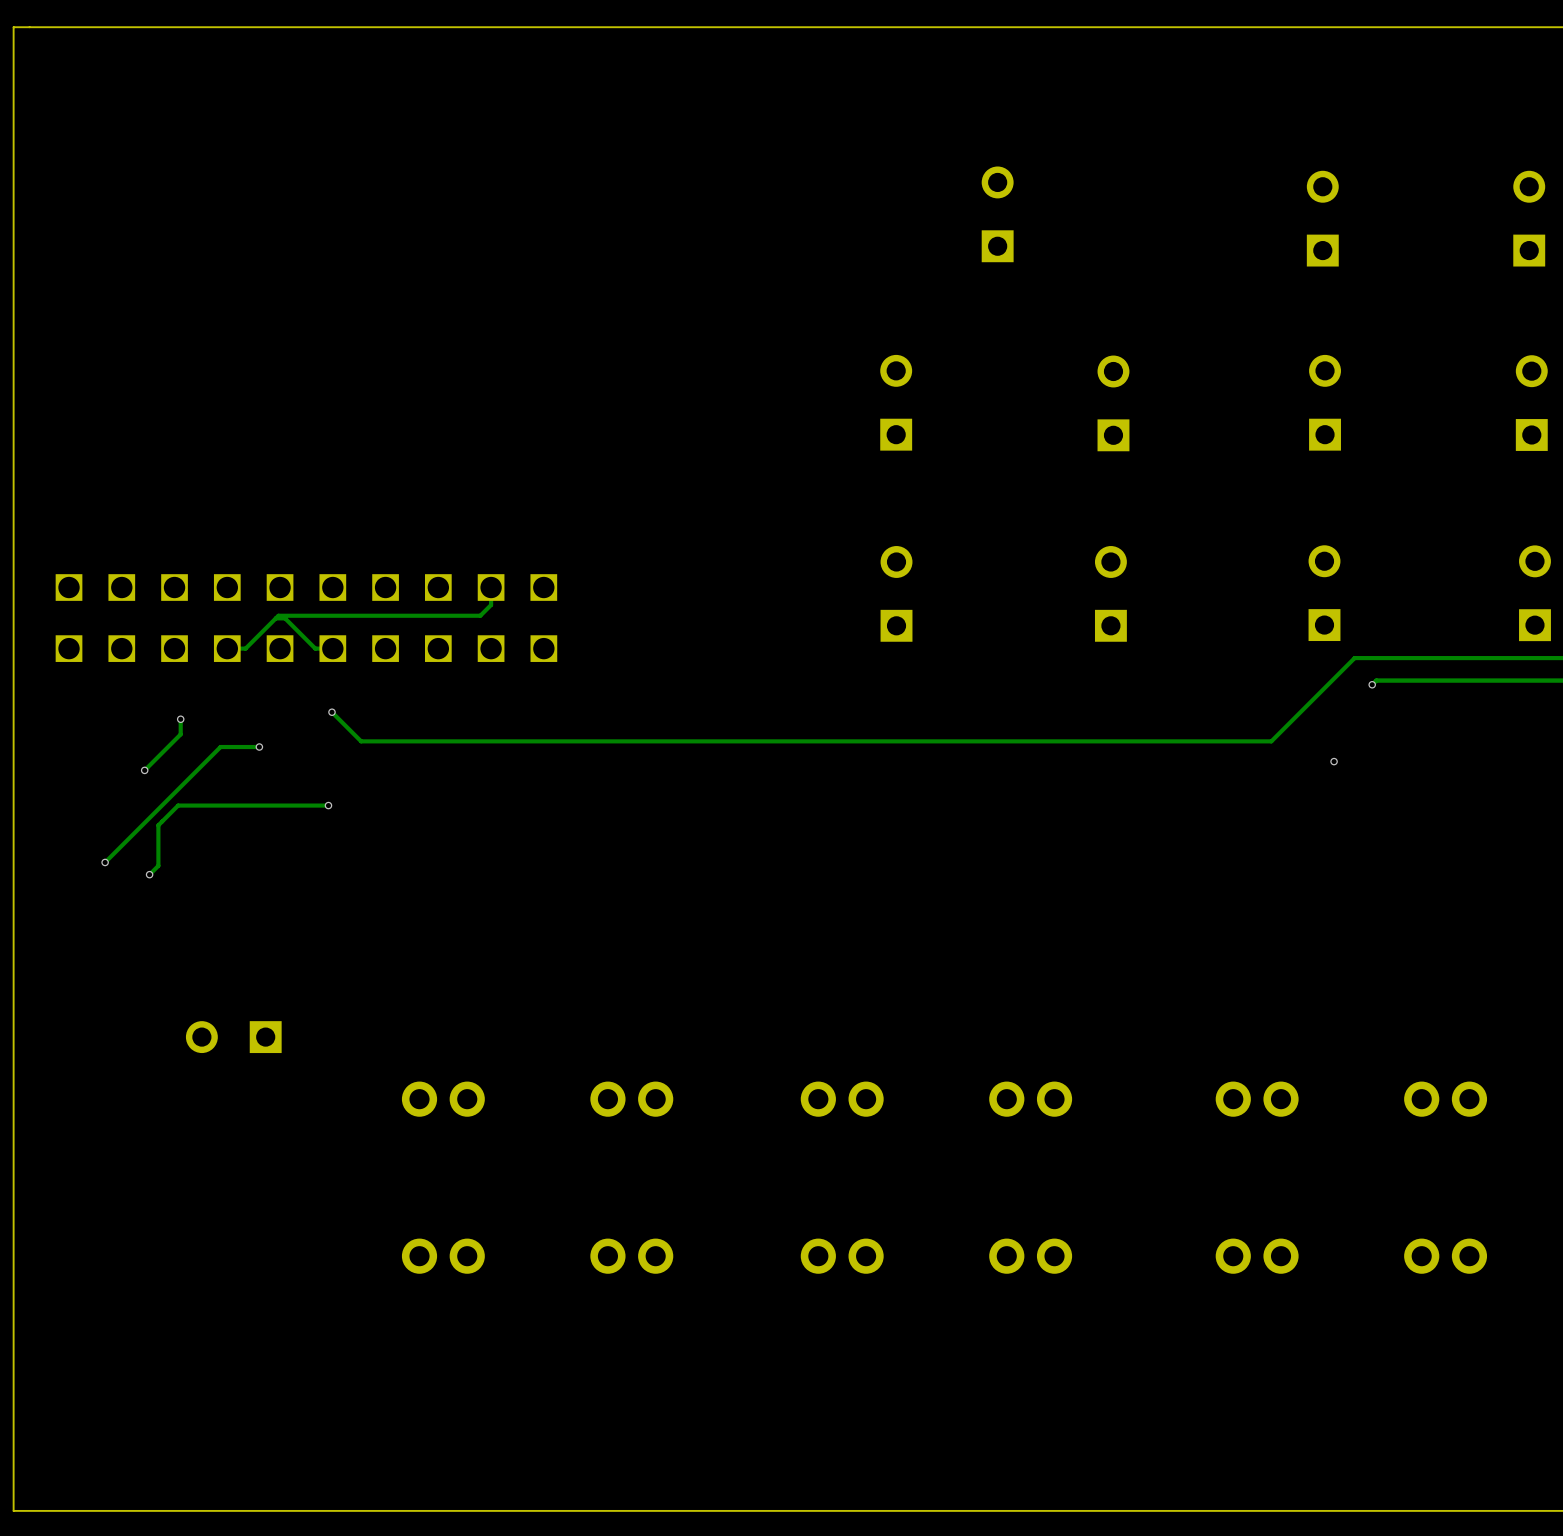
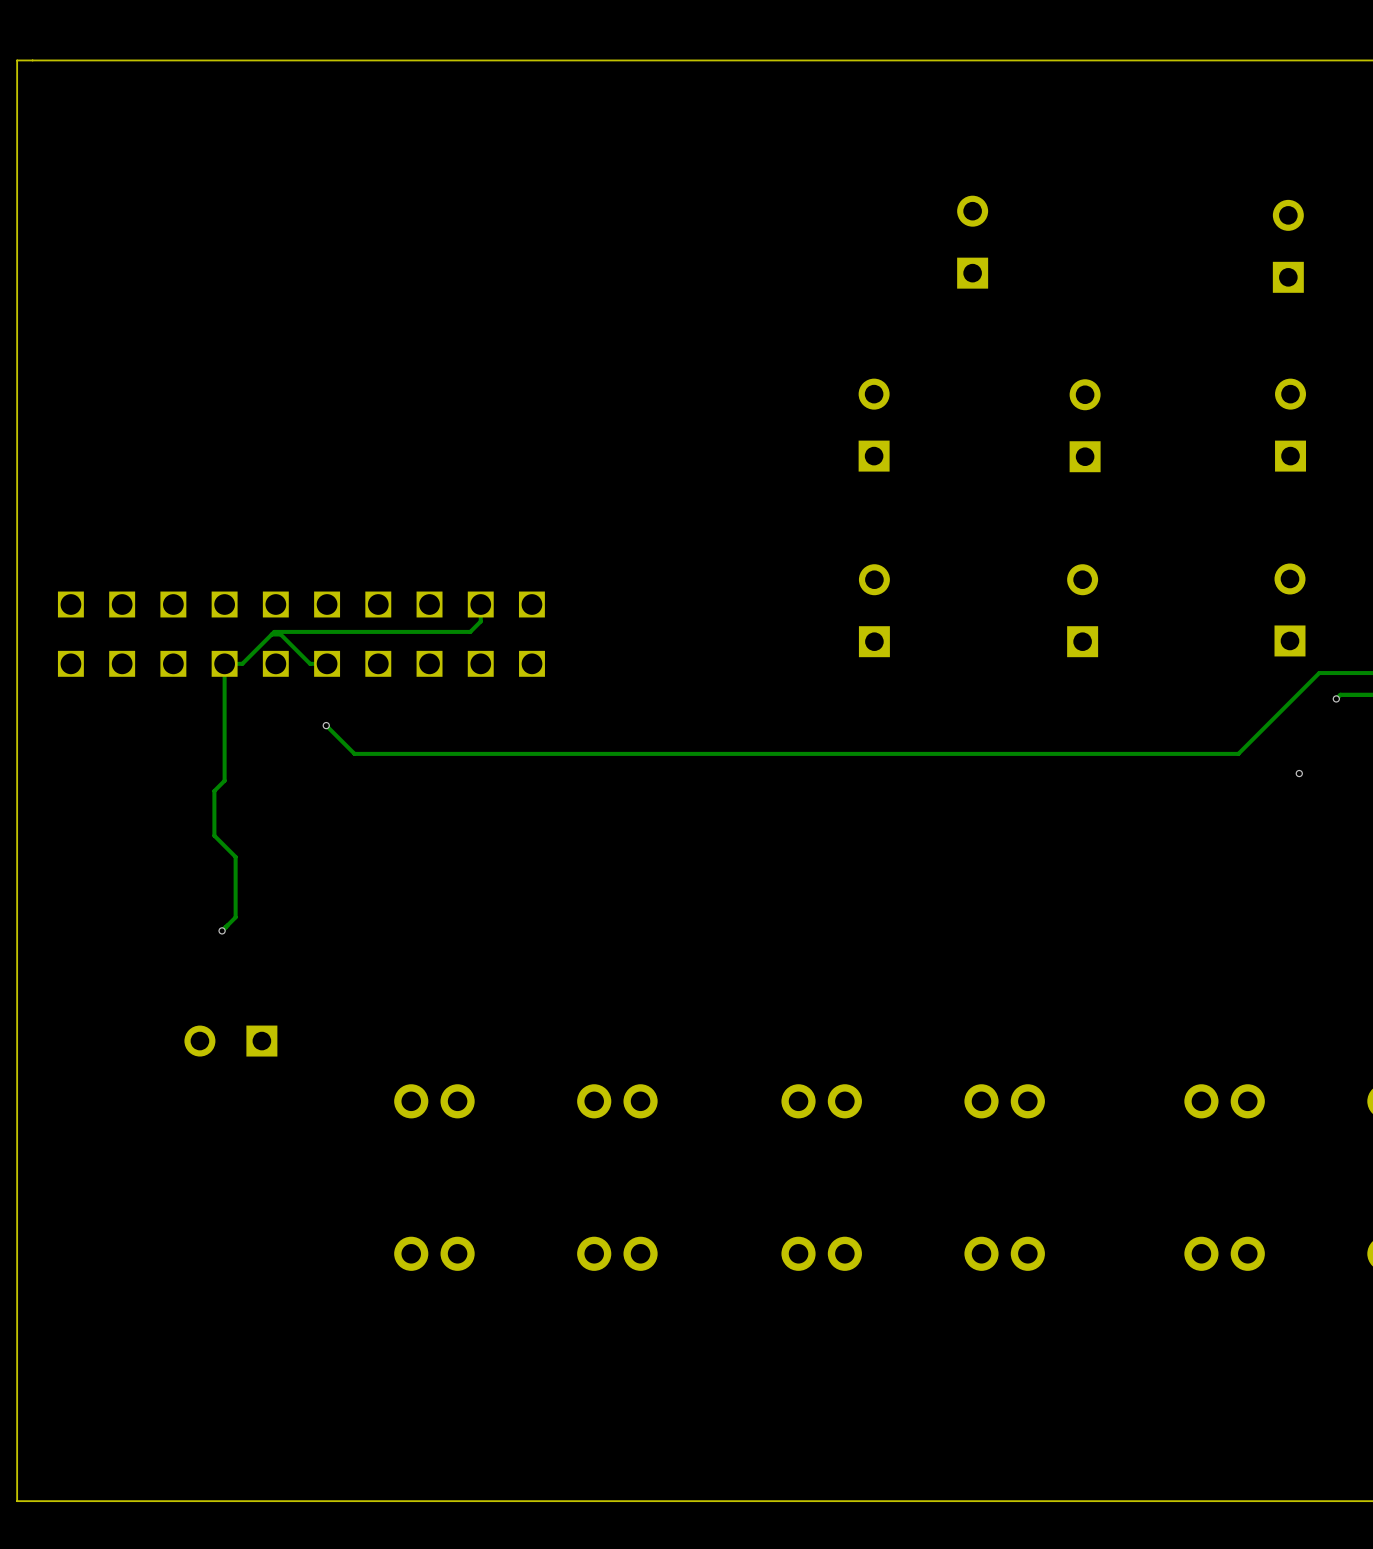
track: none -> (224, 663) (224, 780) (214, 790) (214, 835) (235, 856) (235, 917) (222, 930)
track: (180, 719) (180, 734) (144, 770) -> none
via: (180, 719) -> none
track: (259, 747) (220, 747) (105, 862) -> none
via: (259, 747) -> none
via: (144, 770) -> none
track: (328, 805) (178, 805) (158, 825) (158, 865) (149, 874) -> none
via: (328, 805) -> none
via: (105, 862) -> none
via: (149, 874) -> none
via: none -> (222, 930)

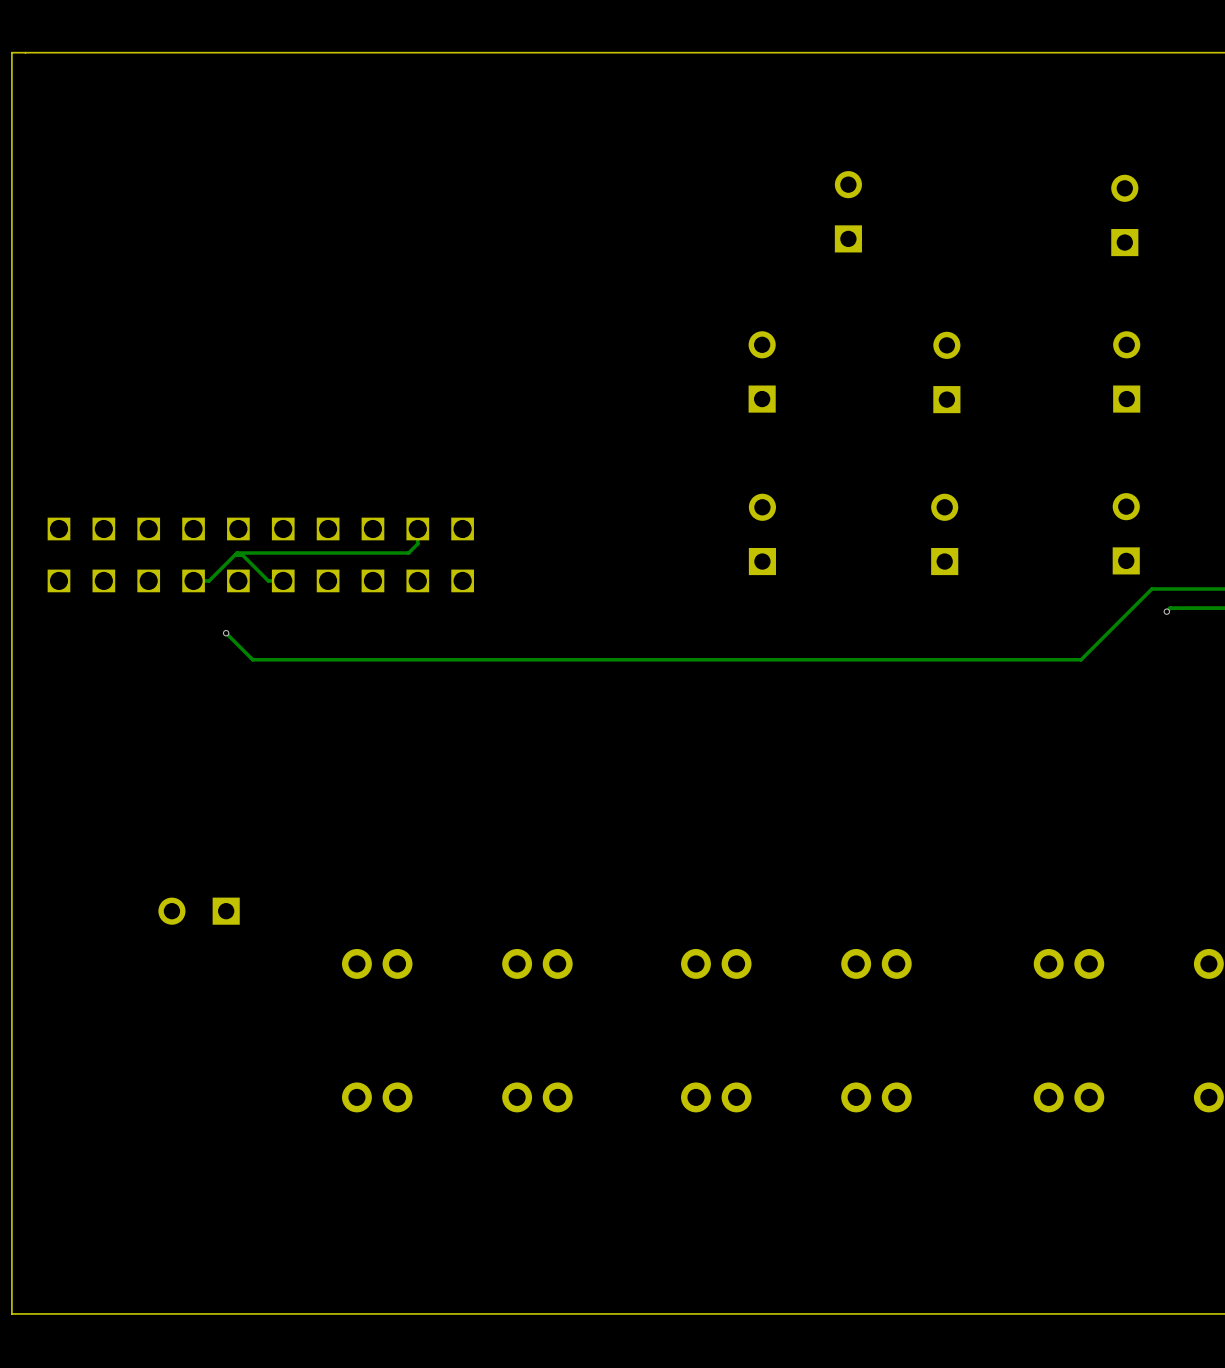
track: (224, 663) (224, 780) (214, 790) (214, 835) (235, 856) (235, 917) (222, 930) -> none
track: (326, 725) (354, 753) -> (226, 633) (252, 659) (307, 659)
via position: (326, 725) -> (226, 633)
via: (1299, 773) -> none
via: (222, 930) -> none

